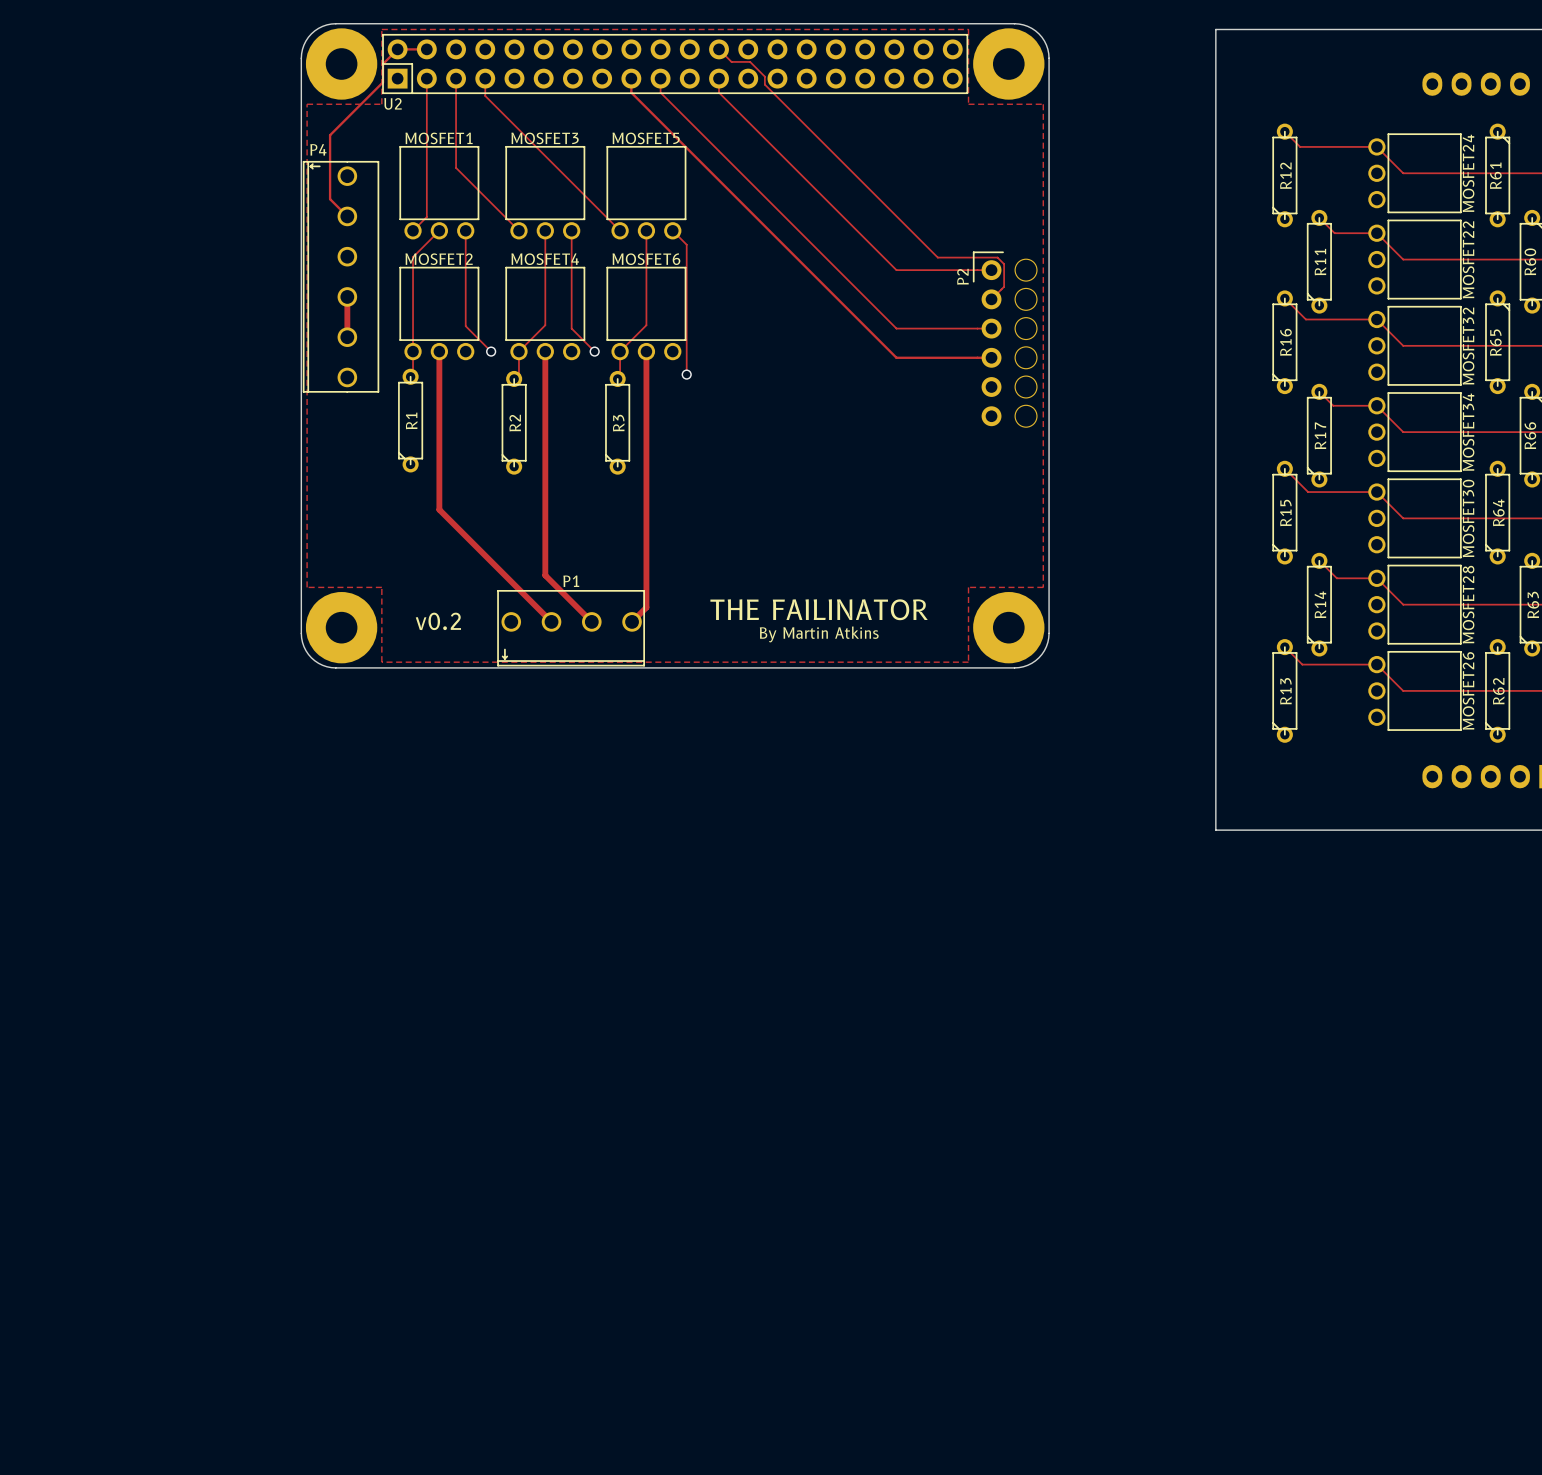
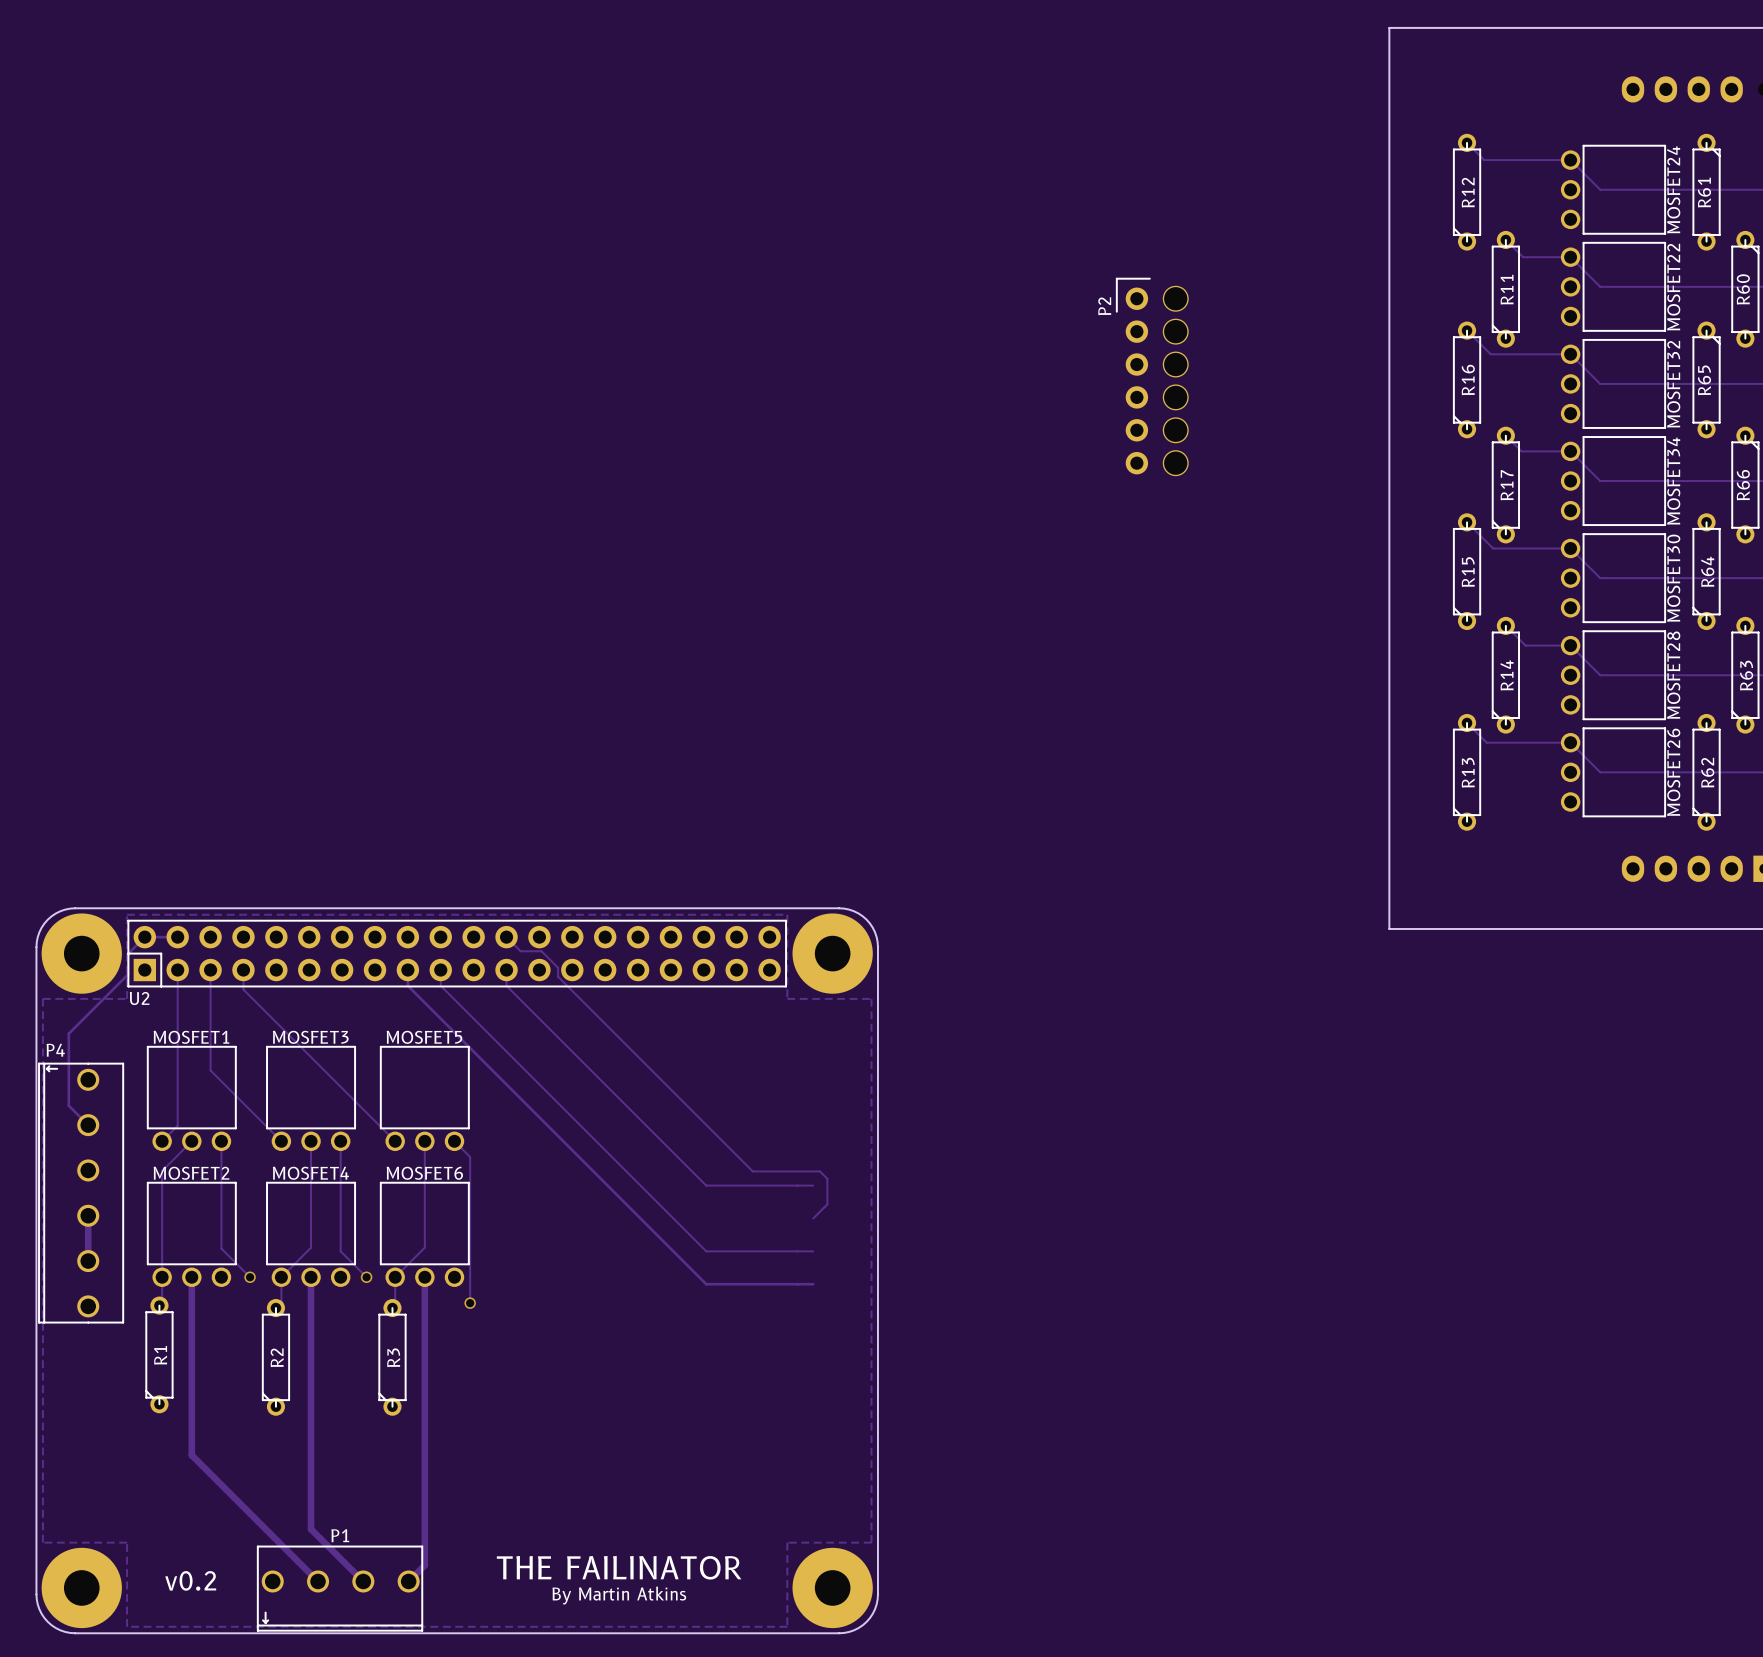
board edge: (335, 23) (1014, 23) (1027, 26) (1038, 33) (1046, 45) (1049, 58) (1049, 633) (1046, 646) (1038, 657) (1027, 665) (1014, 667) (335, 667) (322, 665) (311, 657) (303, 646) (301, 633) (301, 58) (303, 45) (311, 33) (322, 26) (335, 23) -> none
zone outline: (381, 29) (381, 104) (307, 104) (307, 587) (381, 587) (381, 662) (968, 662) (968, 587) (1043, 587) (1043, 104) (968, 104) (968, 29) (381, 29) -> none
track: (426, 49) (397, 49) (383, 64) (383, 82) (330, 135) (330, 199) (347, 216) -> none
track: (719, 49) (731, 61) (750, 61) (764, 76) (764, 84) (937, 257) (997, 257) (1004, 264) (1004, 286) (991, 299) -> none
part: (341, 64) -> none
U2 position: (675, 64) -> (457, 953)
part: (1008, 64) -> none
track: (426, 78) (426, 216) (413, 230) -> none
track: (456, 78) (456, 167) (518, 230) -> none
track: (485, 78) (485, 95) (620, 230) -> none
track: (631, 78) (631, 92) (896, 357) (991, 357) -> none
track: (662, 78) (660, 78) (660, 92) (896, 328) (991, 328) -> none
track: (719, 78) (719, 92) (896, 270) (991, 270) -> none
MOSFET1 position: (439, 192) -> (191, 1098)
MOSFET3 position: (545, 192) -> (311, 1098)
MOSFET5 position: (646, 192) -> (424, 1098)
track: (439, 230) (413, 257) (413, 374) (410, 376) -> none
track: (465, 230) (465, 326) (491, 351) -> none
track: (545, 230) (545, 325) (518, 351) (518, 374) (514, 378) -> none
track: (571, 230) (571, 328) (594, 351) -> none
track: (646, 230) (646, 325) (620, 351) (620, 376) (617, 378) -> none
track: (672, 230) (686, 244) (686, 374) -> none
P4 position: (341, 276) -> (81, 1193)
track: (347, 296) (347, 337) -> none
MOSFET2 position: (439, 313) -> (191, 1234)
MOSFET4 position: (545, 313) -> (311, 1234)
MOSFET6 position: (646, 313) -> (424, 1234)
track: (439, 351) (439, 509) (551, 621) -> none
via: (491, 351) -> none
track: (545, 351) (545, 575) (591, 621) -> none
via: (594, 351) -> none
track: (646, 351) (646, 607) (632, 621) -> none
via: (686, 374) -> none
R1 position: (410, 420) -> (159, 1354)
R2 position: (514, 422) -> (275, 1357)
R3 position: (617, 422) -> (392, 1357)
text: THE FAILINATOR (819, 609) -> none
text: v0.2 (438, 621) -> none
part: (341, 627) -> none
part: (1008, 627) -> none
P1 position: (571, 628) -> (340, 1588)
text: By Martin Atkins (819, 634) -> none
board edge: none -> (75, 908) (839, 908) (853, 911) (866, 919) (875, 932) (877, 947) (877, 1594) (875, 1609) (866, 1621) (853, 1630) (839, 1633) (75, 1633) (60, 1630) (47, 1621) (39, 1609) (36, 1594) (36, 947) (39, 932) (47, 919) (60, 911) (75, 908)
zone outline: none -> (127, 914) (127, 998) (42, 998) (42, 1542) (127, 1542) (127, 1626) (787, 1626) (787, 1542) (871, 1542) (871, 998) (787, 998) (787, 914) (127, 914)
track: none -> (177, 937) (144, 937) (128, 953) (128, 974) (68, 1033) (68, 1105) (88, 1125)
track: none -> (506, 937) (520, 951) (541, 951) (558, 967) (558, 976) (752, 1171) (820, 1171) (827, 1178) (827, 1204) (813, 1218)
part: none -> (81, 953)
part: none -> (832, 953)
track: none -> (177, 970) (177, 1125) (162, 1141)
track: none -> (210, 970) (210, 1070) (281, 1141)
track: none -> (243, 970) (243, 989) (395, 1141)
track: none -> (407, 970) (407, 985) (706, 1284) (813, 1284)
track: none -> (442, 970) (440, 970) (440, 985) (706, 1251) (813, 1251)
track: none -> (506, 970) (506, 985) (706, 1185) (813, 1185)
track: none -> (191, 1141) (162, 1170) (162, 1302) (159, 1305)
track: none -> (221, 1141) (221, 1248) (250, 1277)
track: none -> (311, 1141) (311, 1247) (281, 1277) (281, 1302) (275, 1308)
track: none -> (340, 1141) (340, 1251) (366, 1277)
track: none -> (424, 1141) (424, 1247) (395, 1277) (395, 1305) (392, 1308)
track: none -> (454, 1141) (470, 1156) (470, 1303)
track: none -> (88, 1215) (88, 1261)
track: none -> (191, 1277) (191, 1455) (318, 1581)
via: none -> (250, 1277)
track: none -> (311, 1277) (311, 1529) (363, 1581)
via: none -> (366, 1277)
track: none -> (424, 1277) (424, 1565) (408, 1581)
via: none -> (470, 1303)
text: none -> THE FAILINATOR (619, 1567)
text: none -> v0.2 (190, 1580)
part: none -> (81, 1587)
part: none -> (832, 1587)
text: none -> By Martin Atkins (619, 1595)

